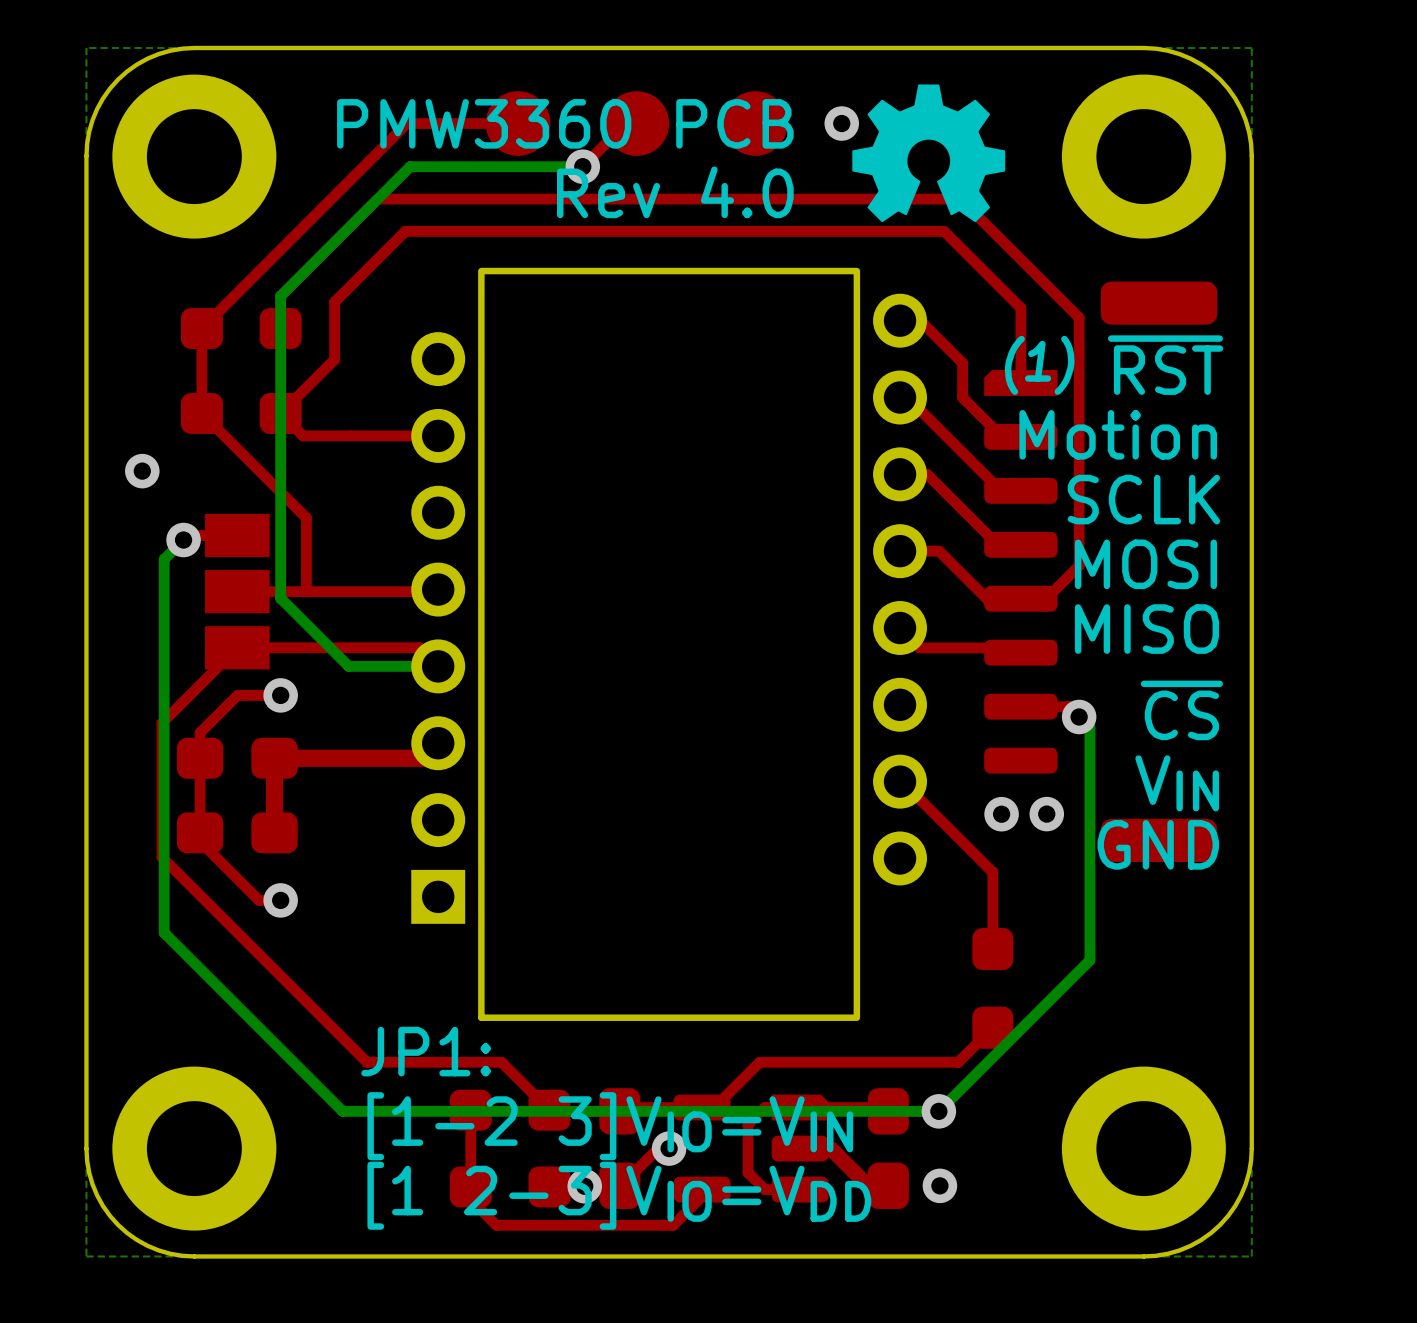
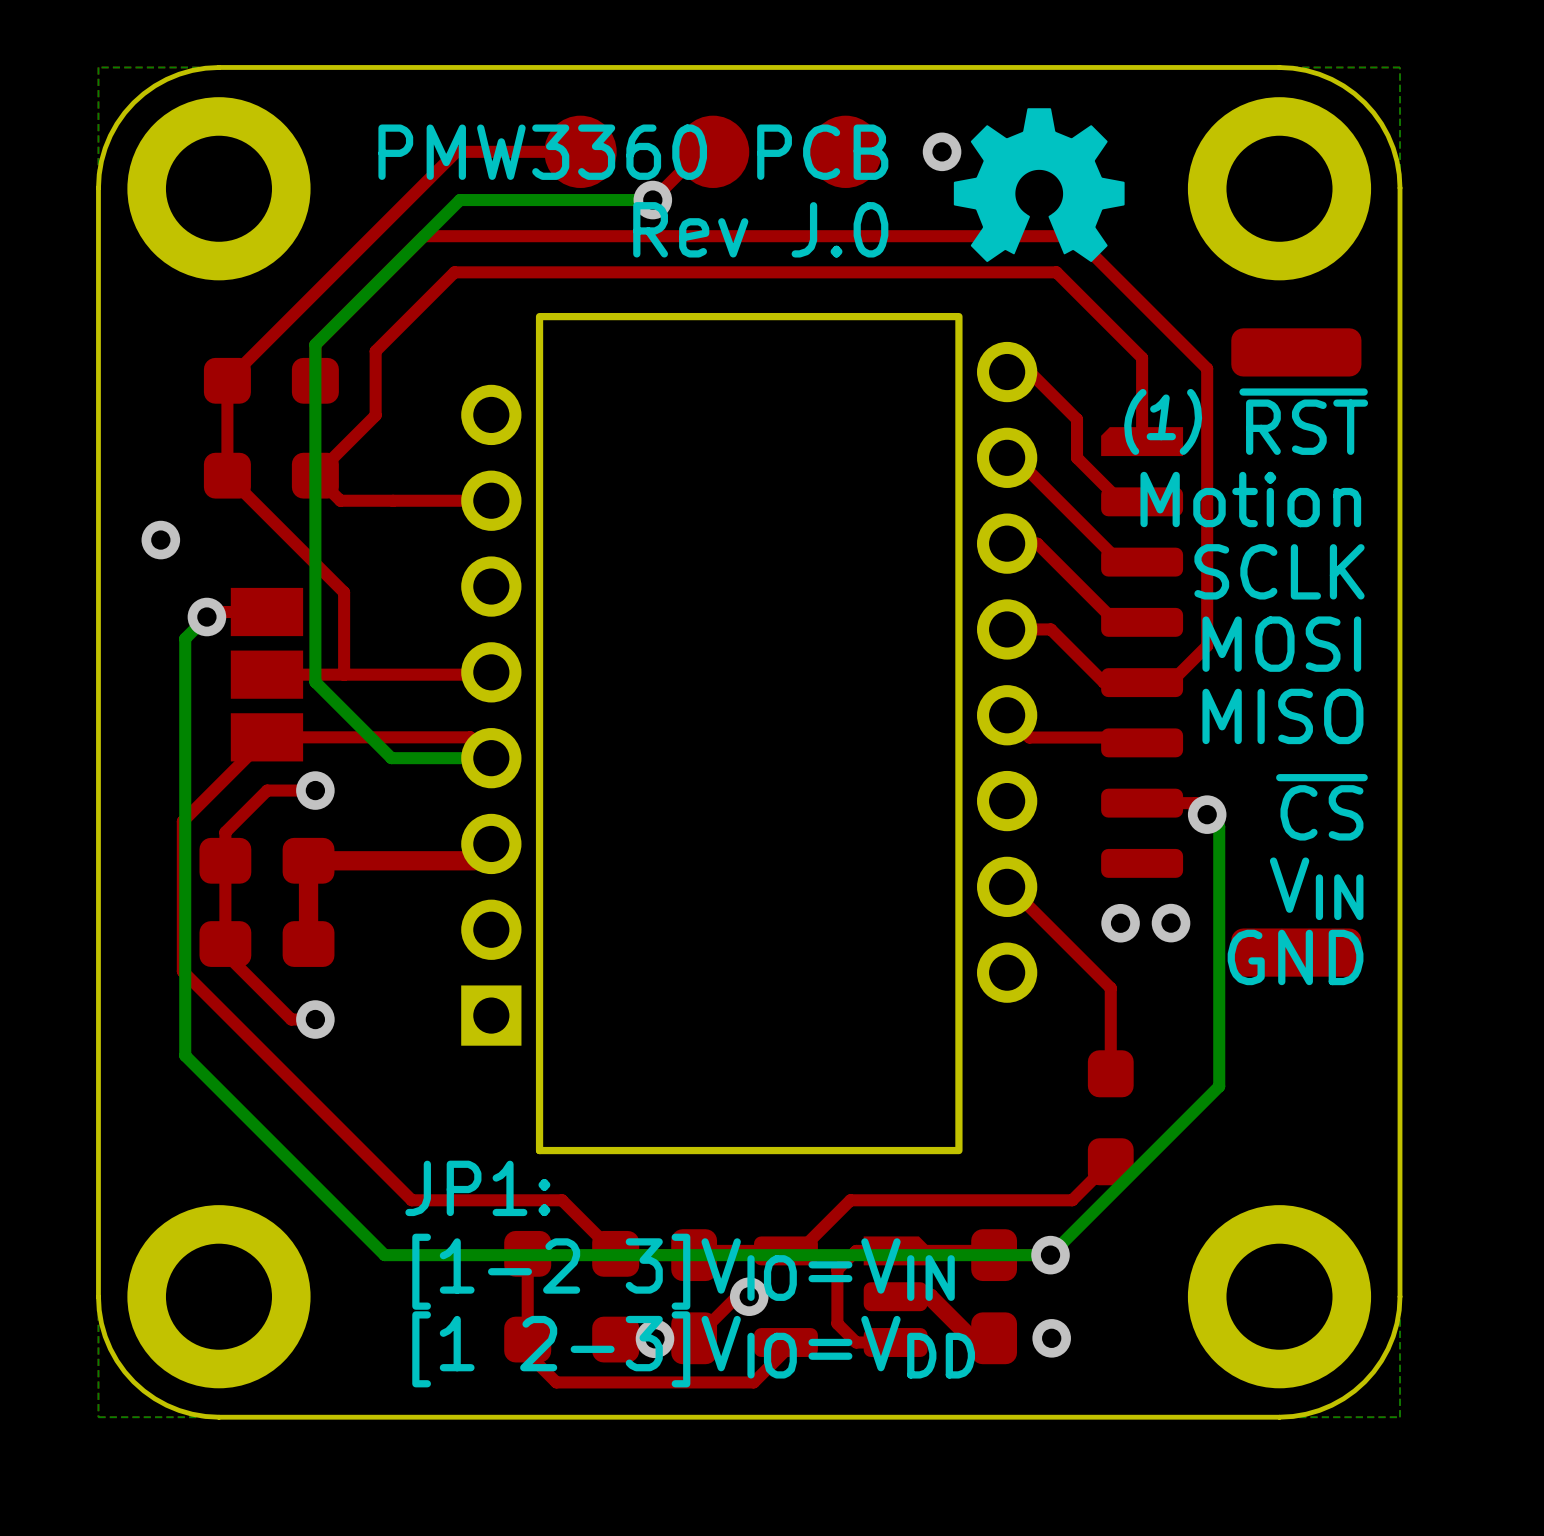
text: Rev 4.0 (675, 192) -> Rev J.0 (760, 229)

